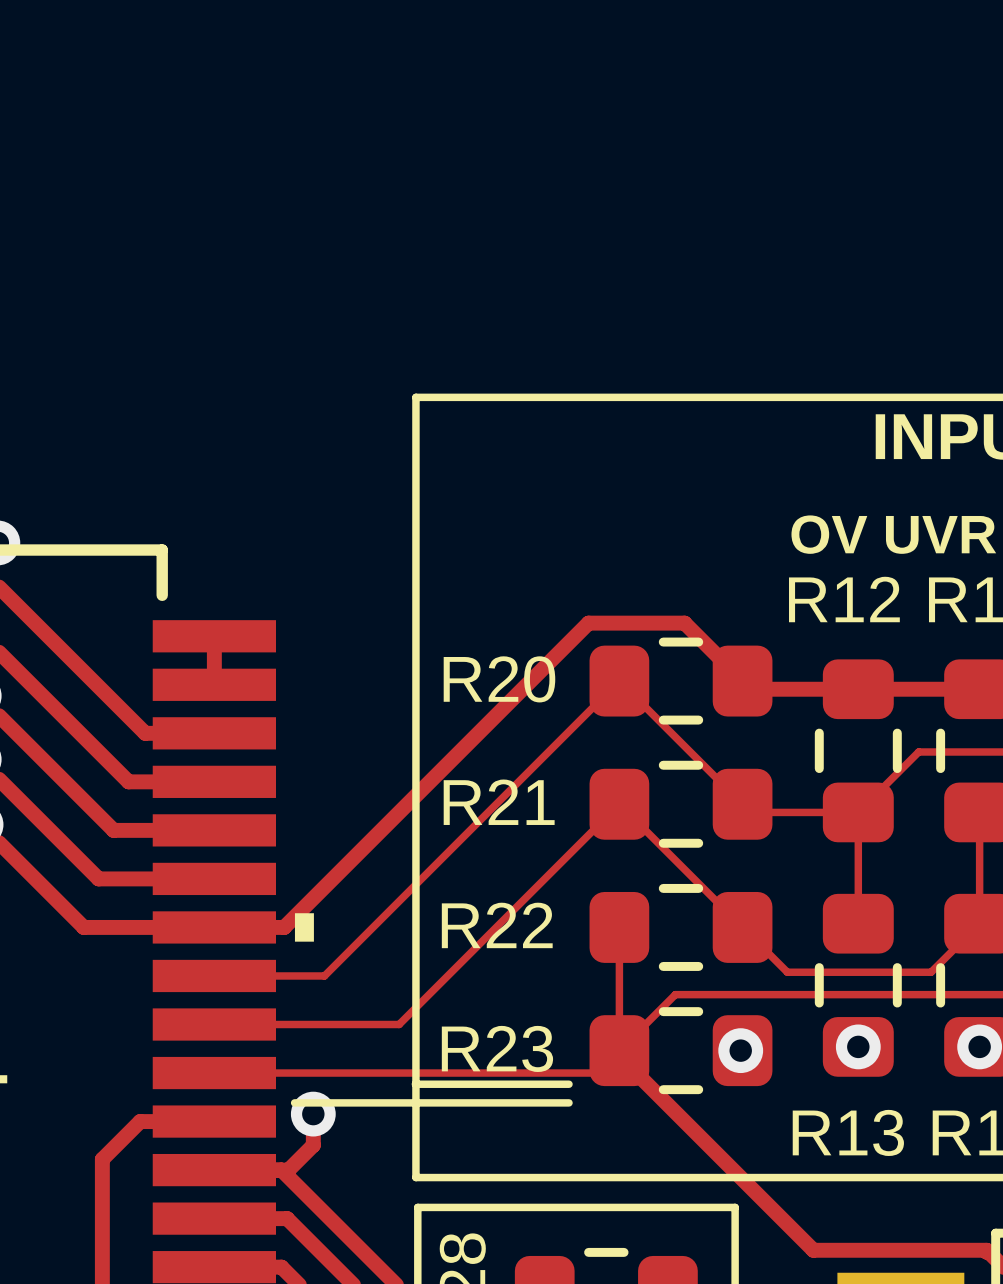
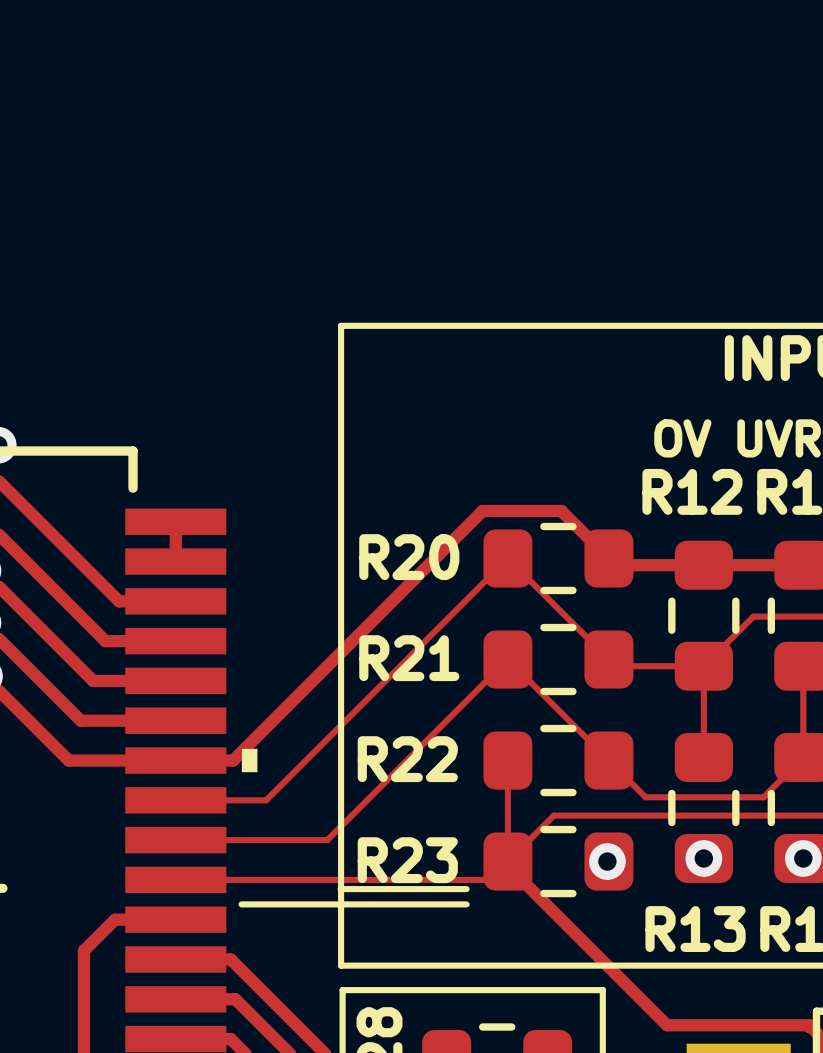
track: (313, 1114) (313, 1145) (288, 1170) (281, 1170) -> none
via: (313, 1114) -> none

